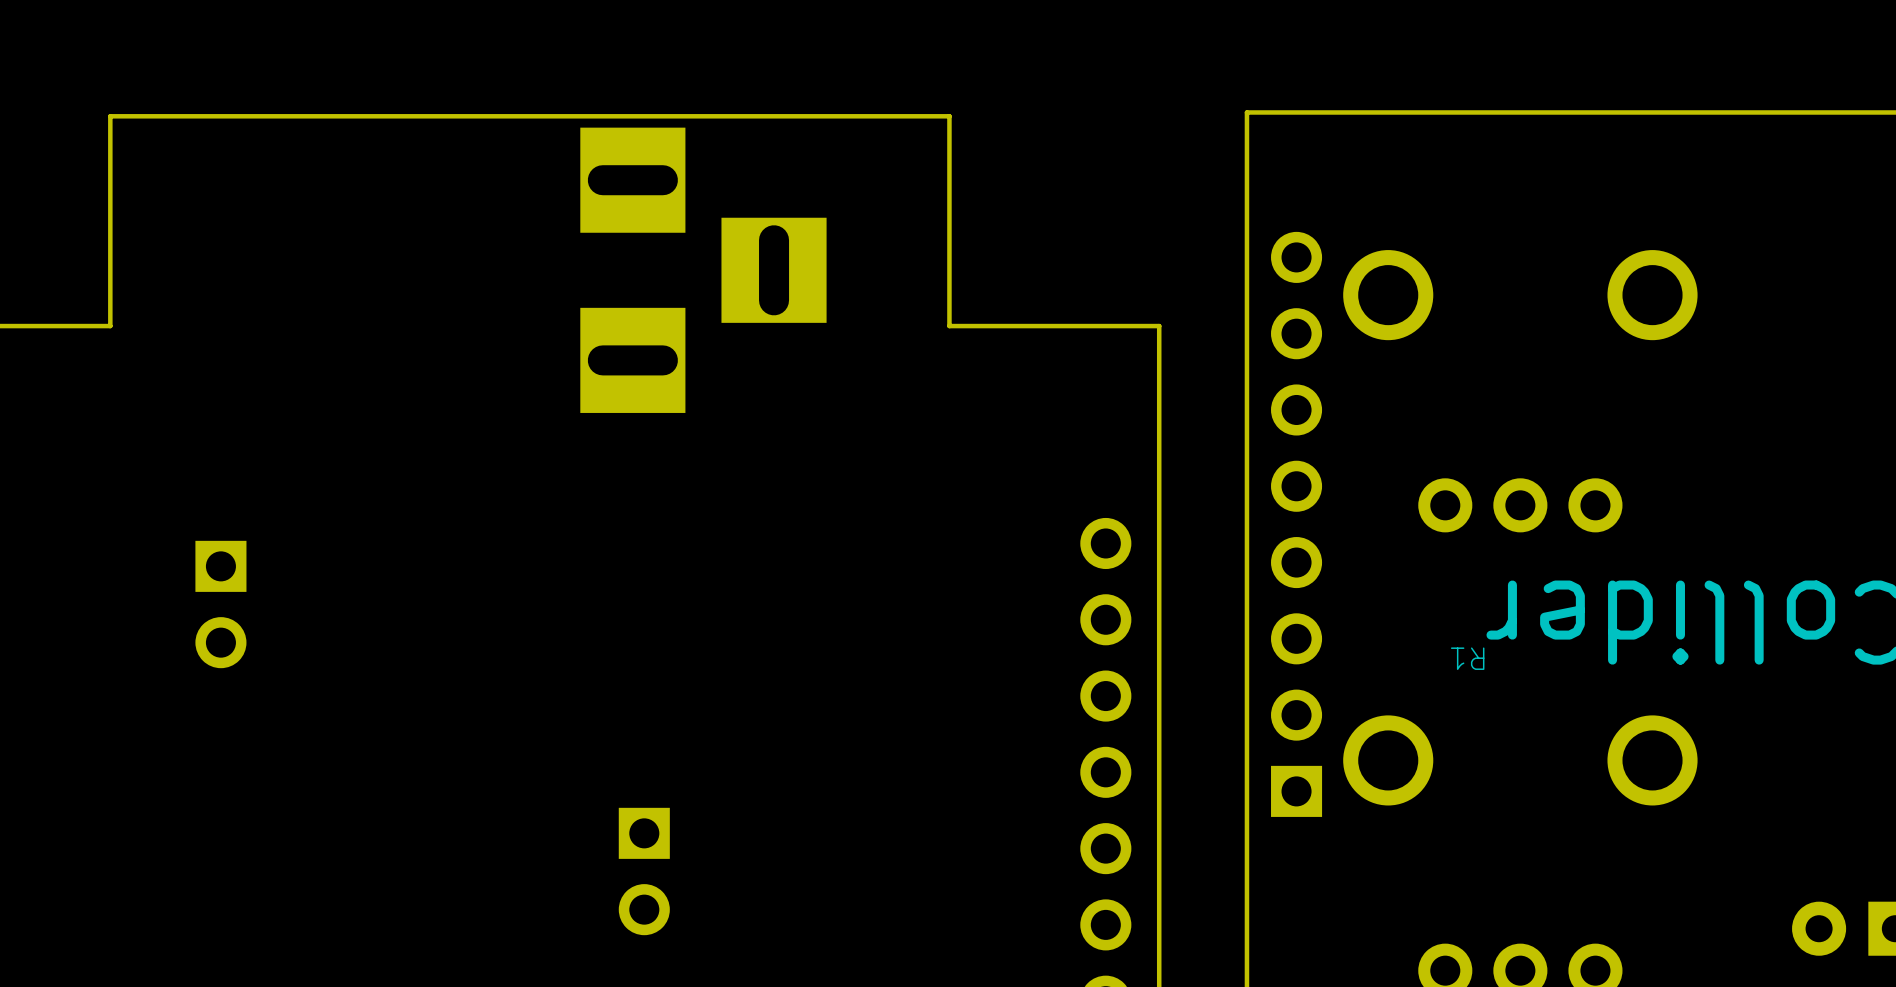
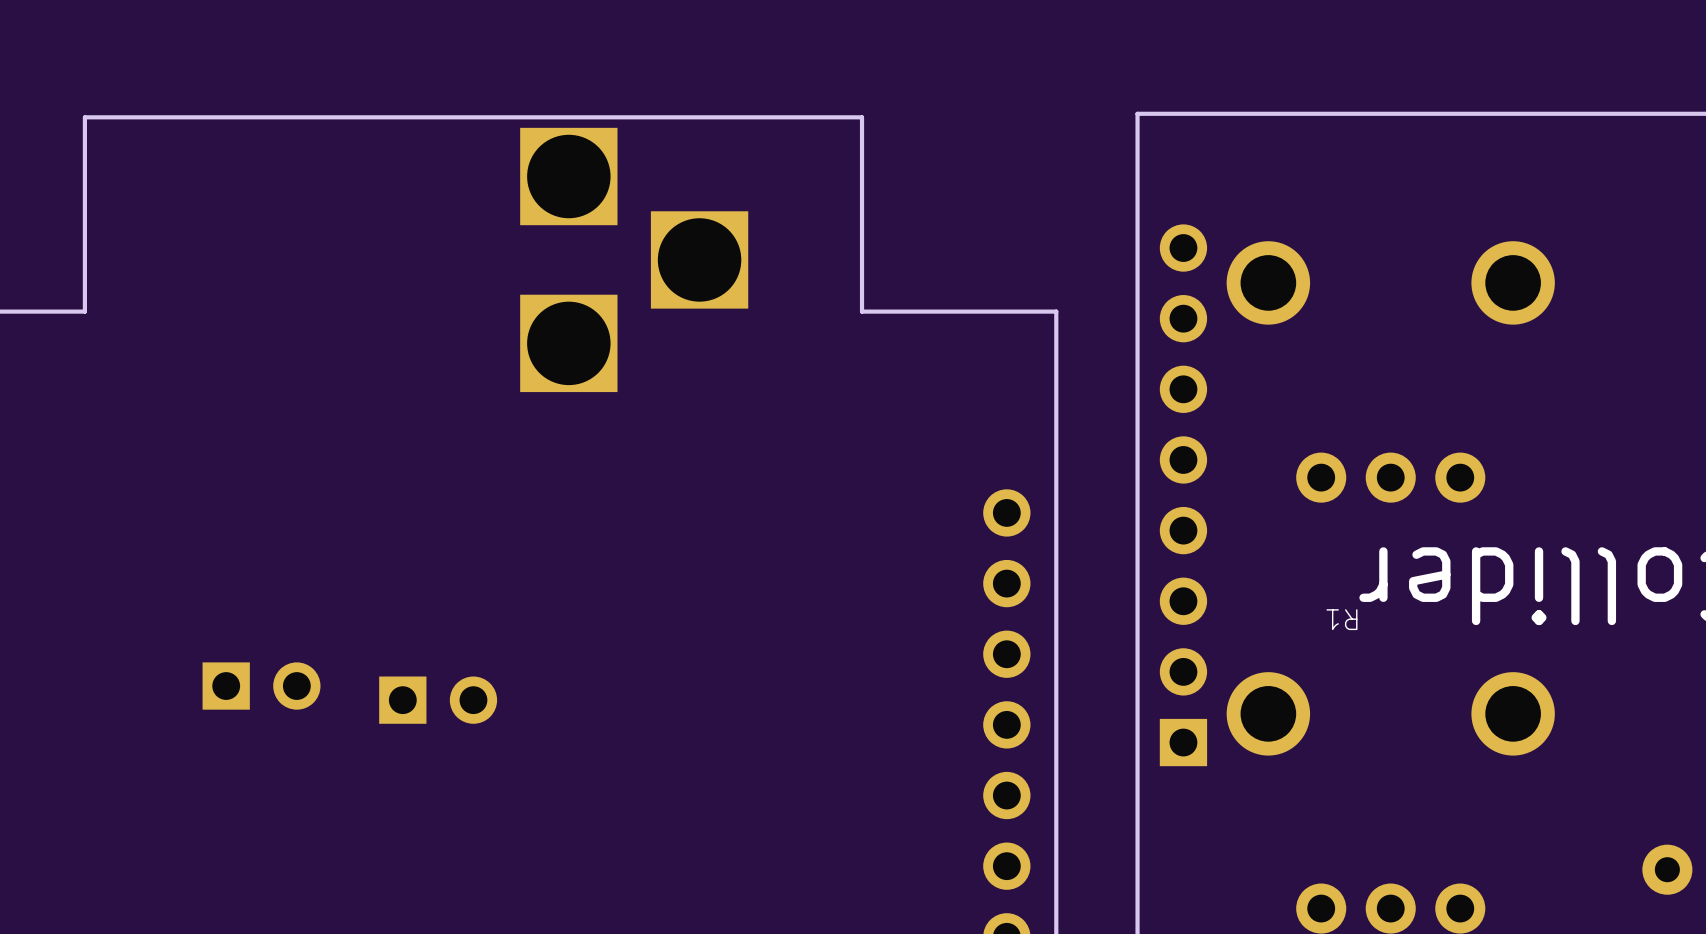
part footprint: [580, 127, 827, 413] -> [520, 127, 749, 393]
part rotation: 0° (220, 604) -> 90° counterclockwise (261, 686)
part position: (220, 604) -> (261, 686)
part: none -> (438, 700)
part: (644, 871) -> none

